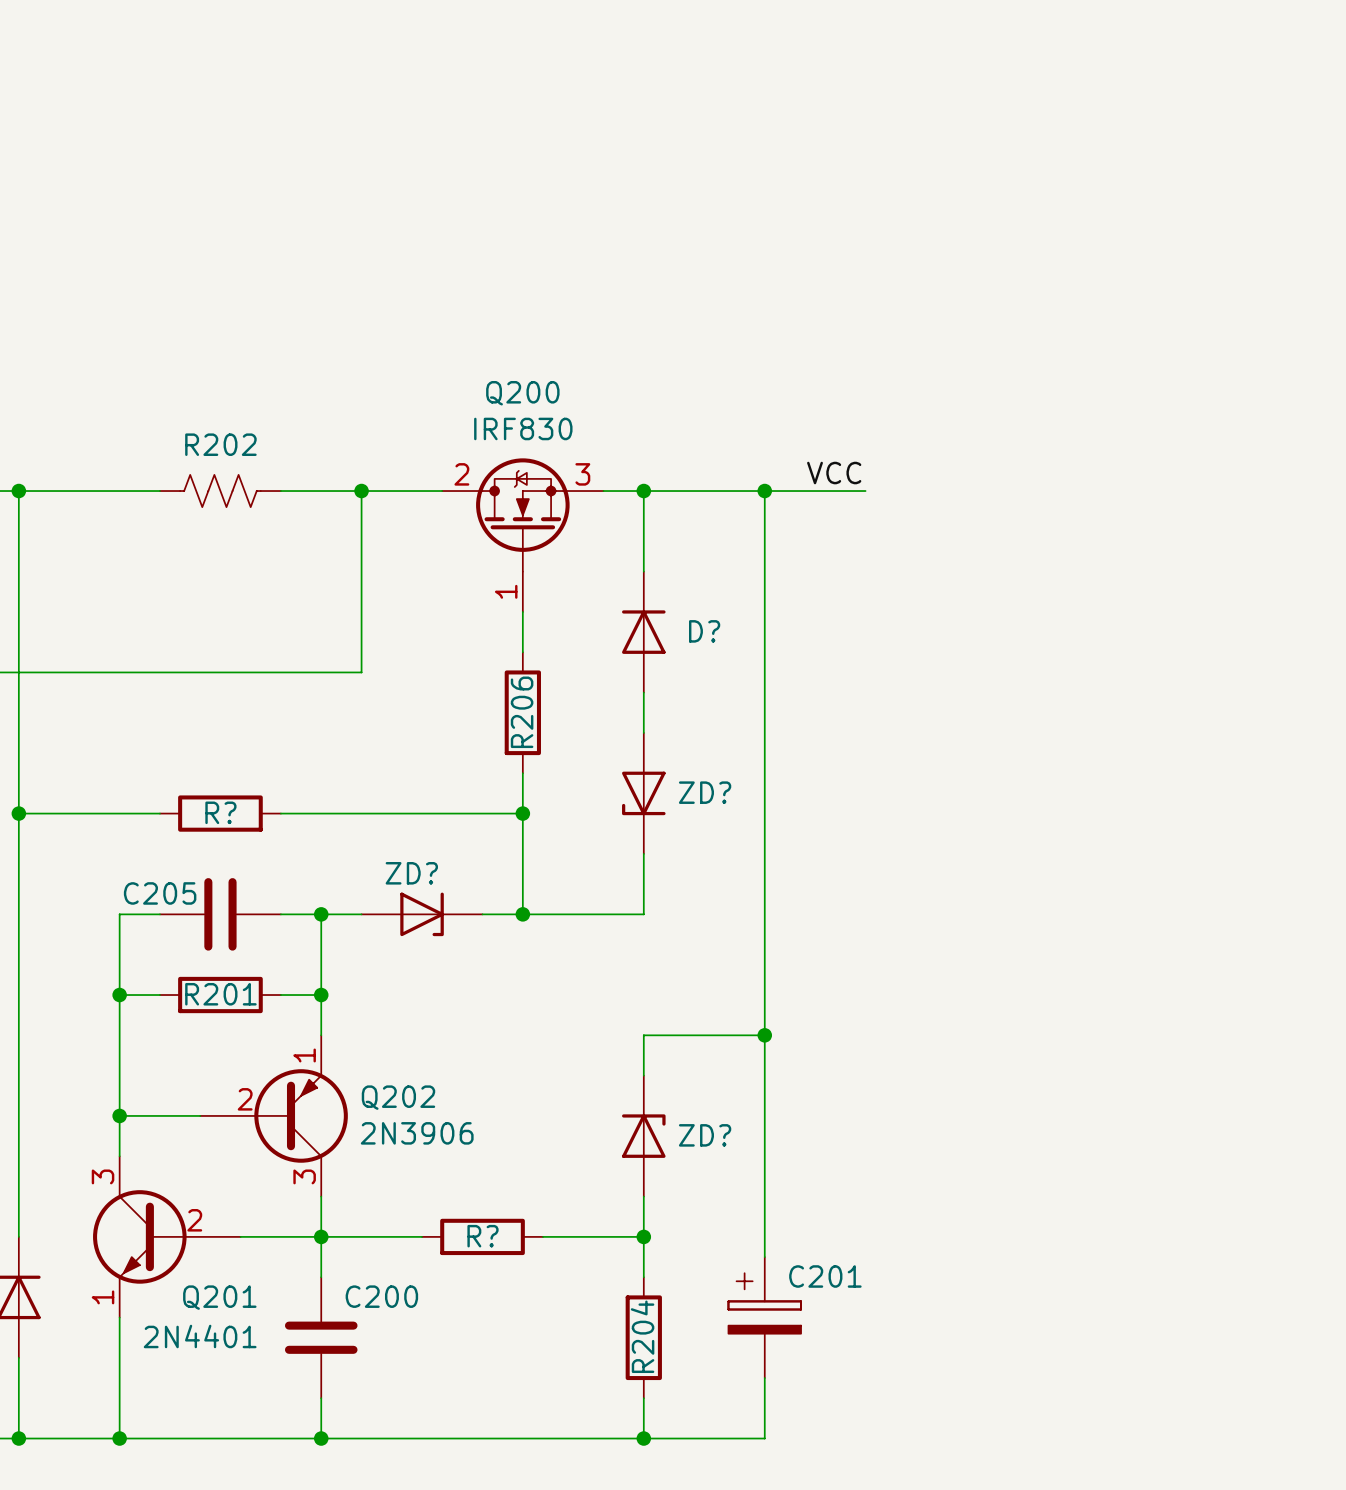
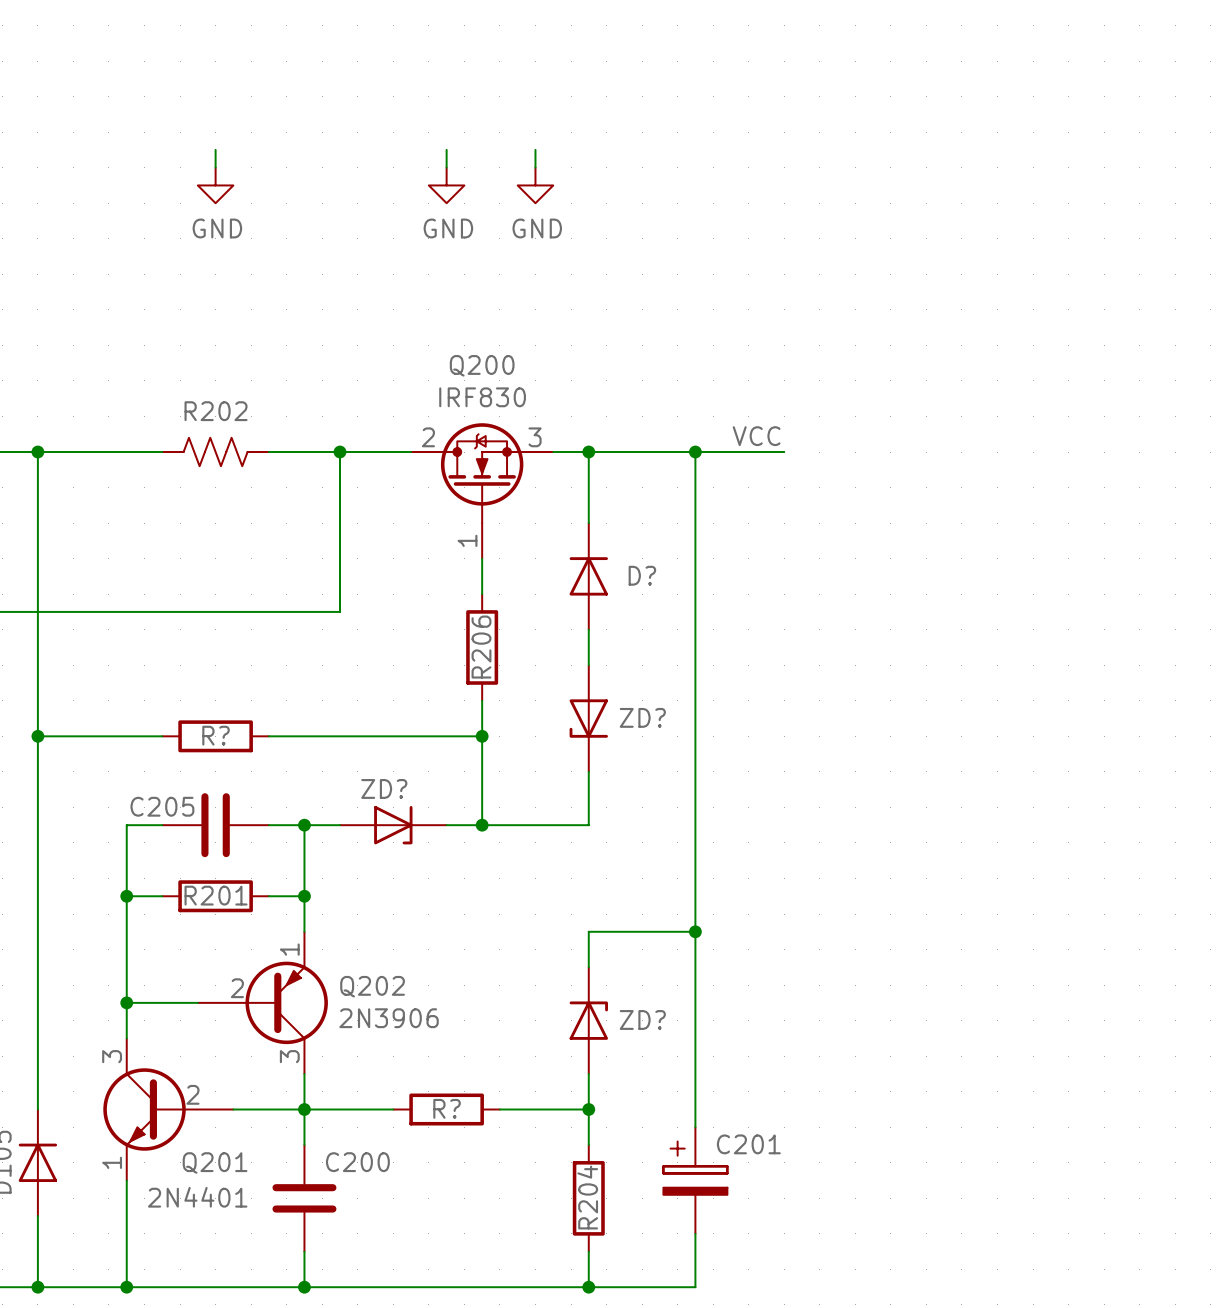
wire: none -> (215, 149) (215, 167)
wire: none -> (446, 149) (446, 167)
wire: none -> (535, 149) (535, 167)
power symbol: none -> GND (215, 185)
power symbol: none -> GND (446, 185)
power symbol: none -> GND (535, 185)

